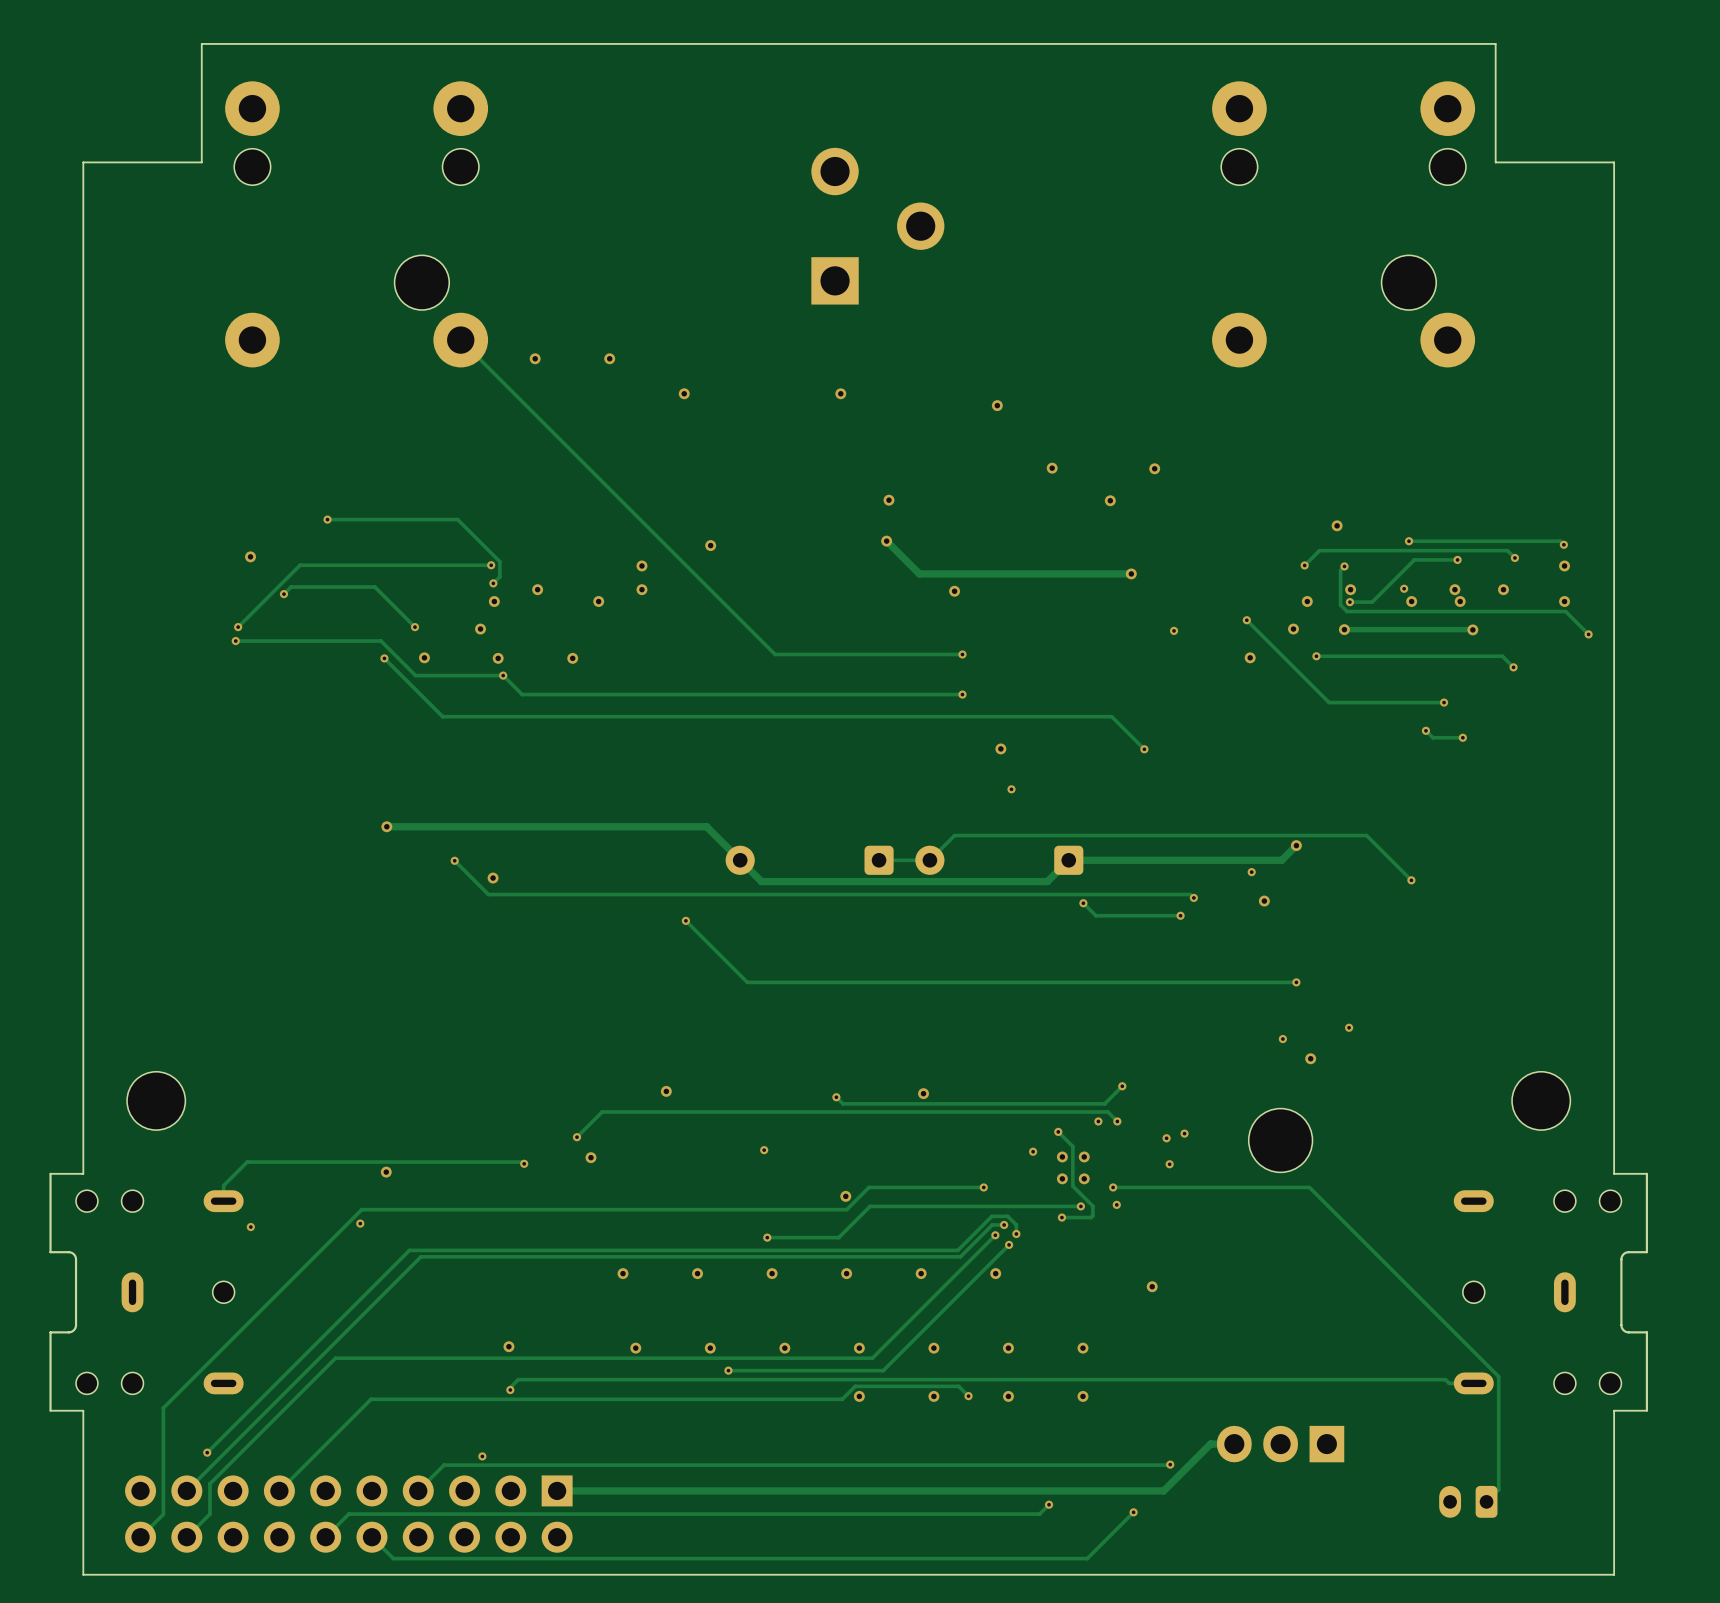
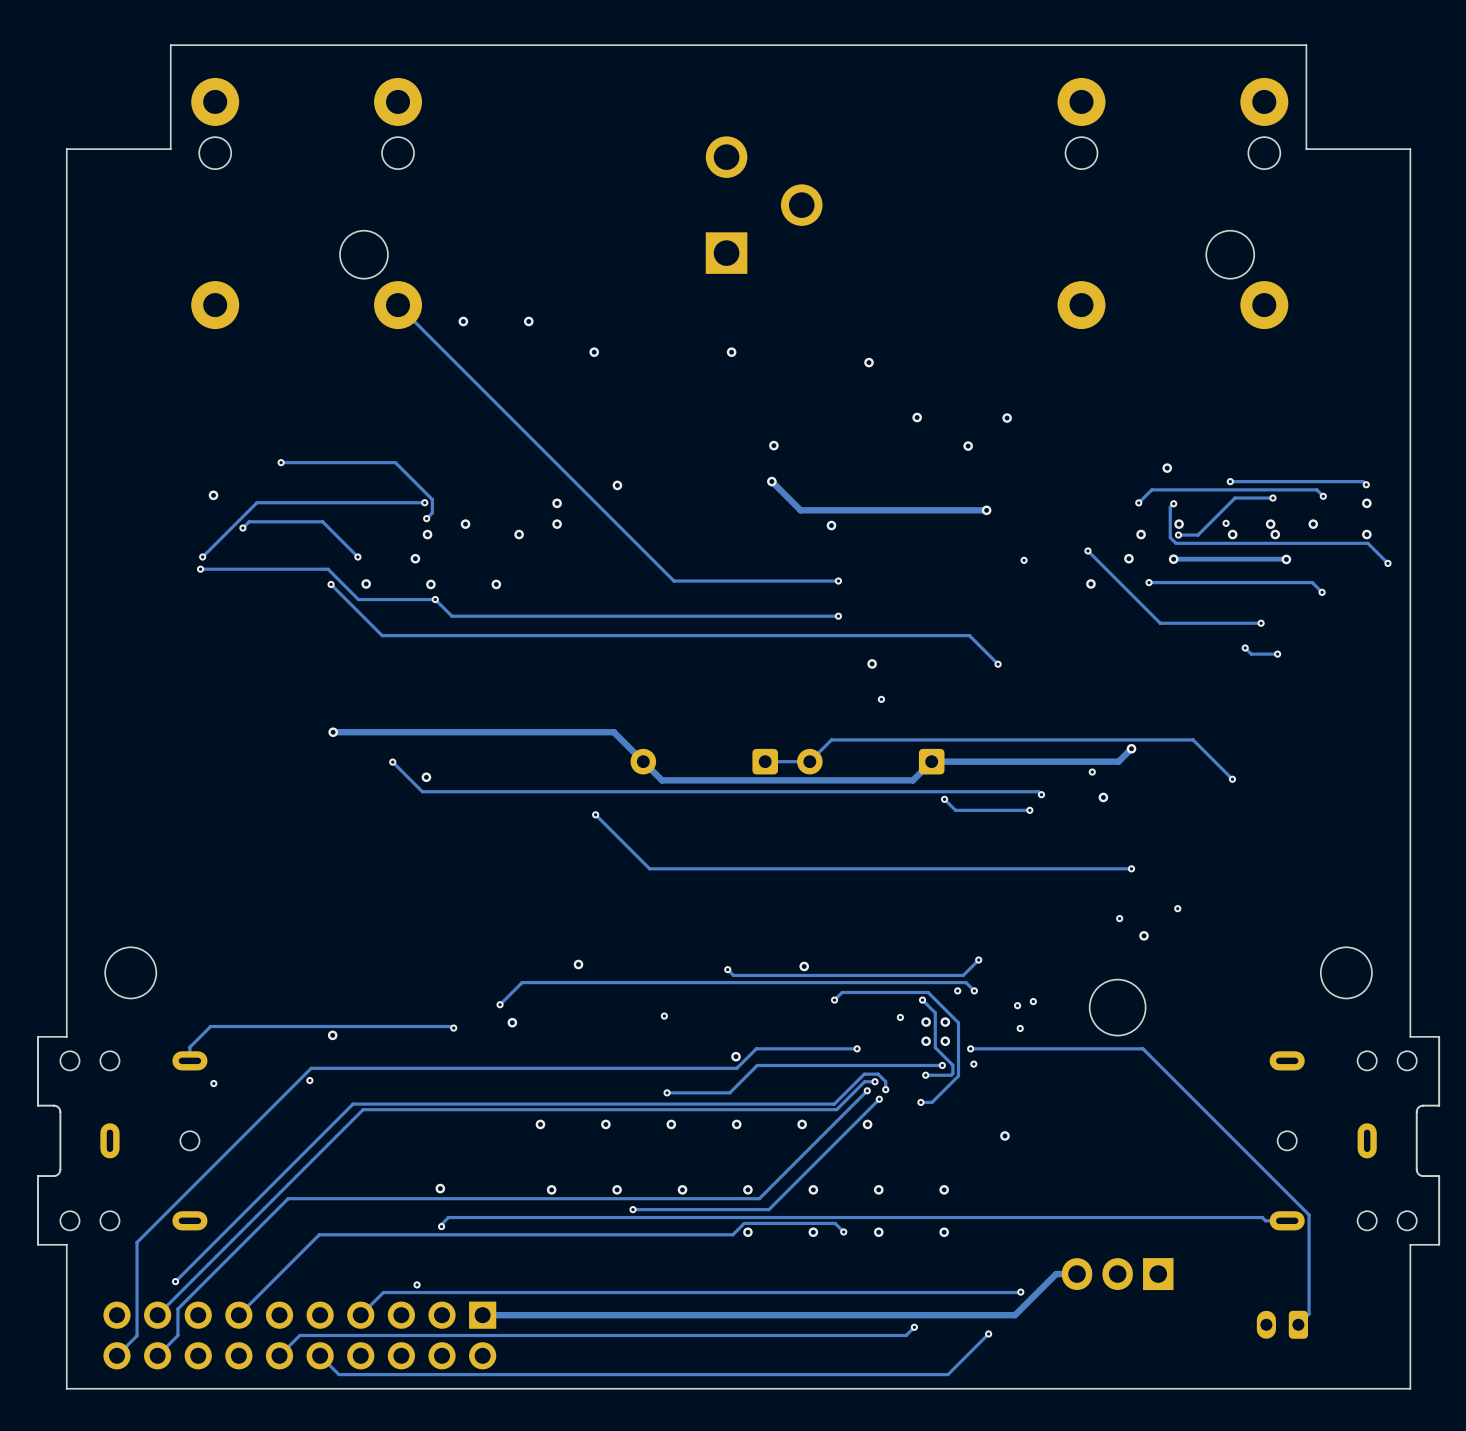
track: none -> (834, 1000) (842, 992) (928, 992) (958, 1022) (958, 1075) (932, 1102) (920, 1102)
via: none -> (834, 1000)
via: none -> (920, 1102)

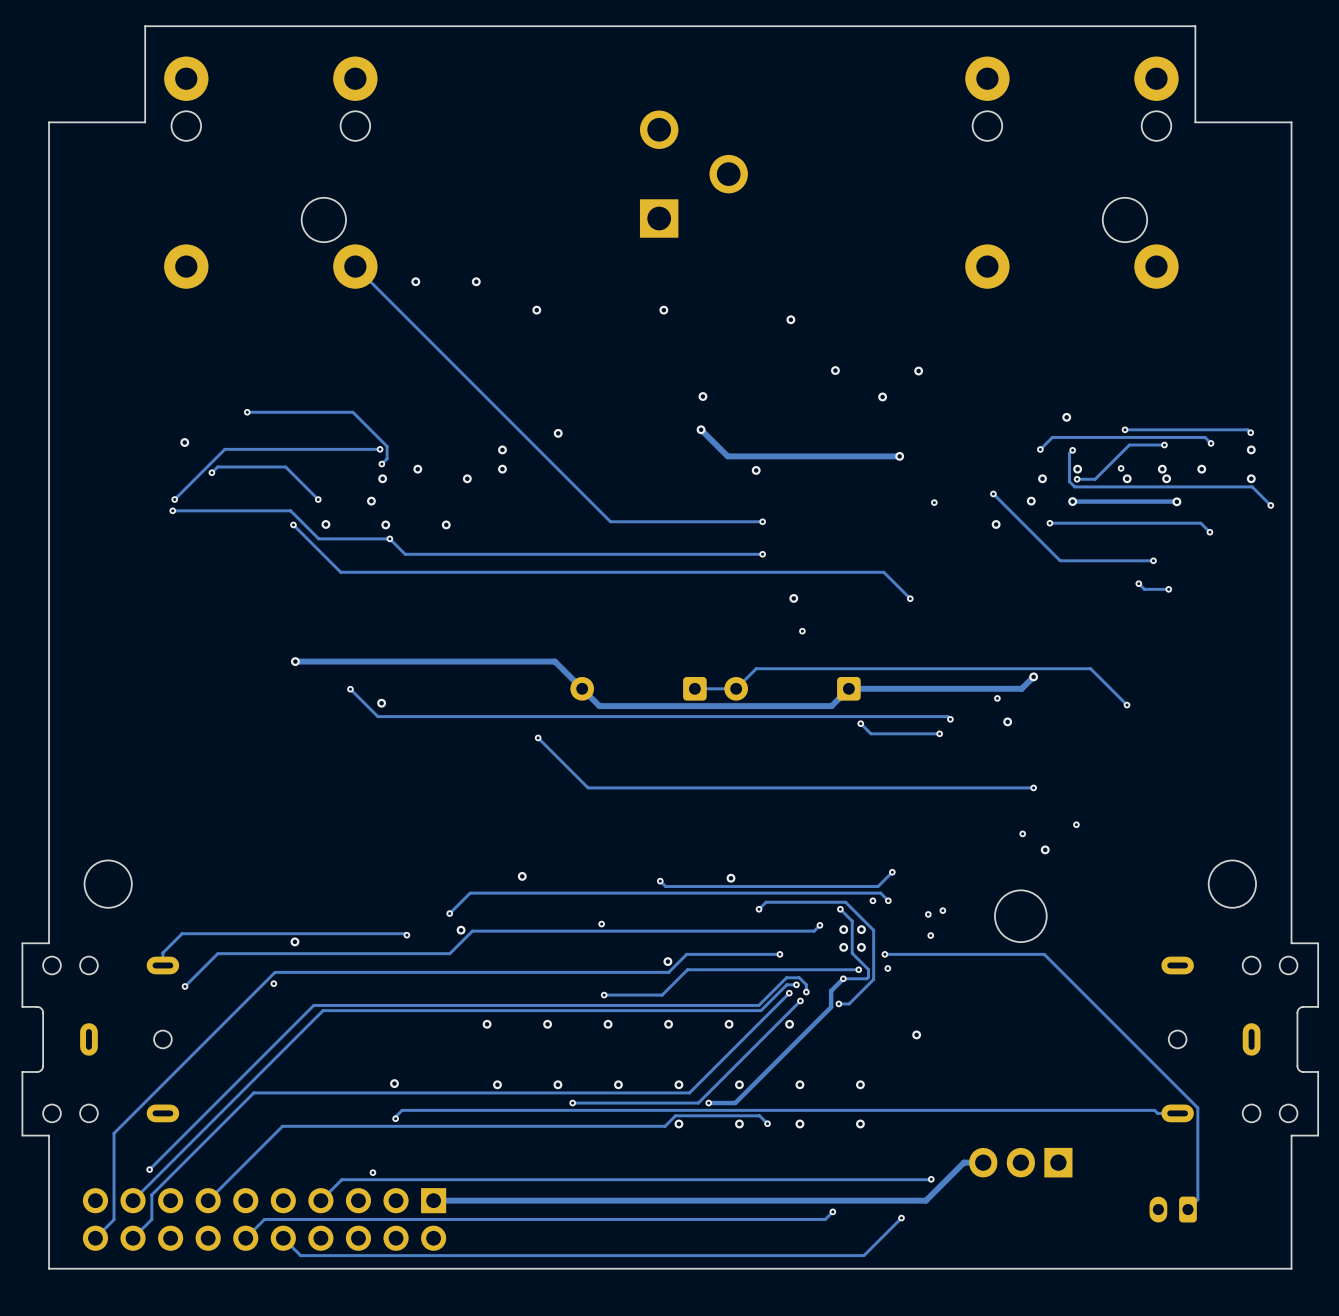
track: none -> (819, 925) (814, 931) (472, 931) (449, 953) (217, 953) (185, 986)
track: none -> (843, 978) (831, 991) (831, 1007) (735, 1103) (708, 1103)
via: none -> (708, 1103)

